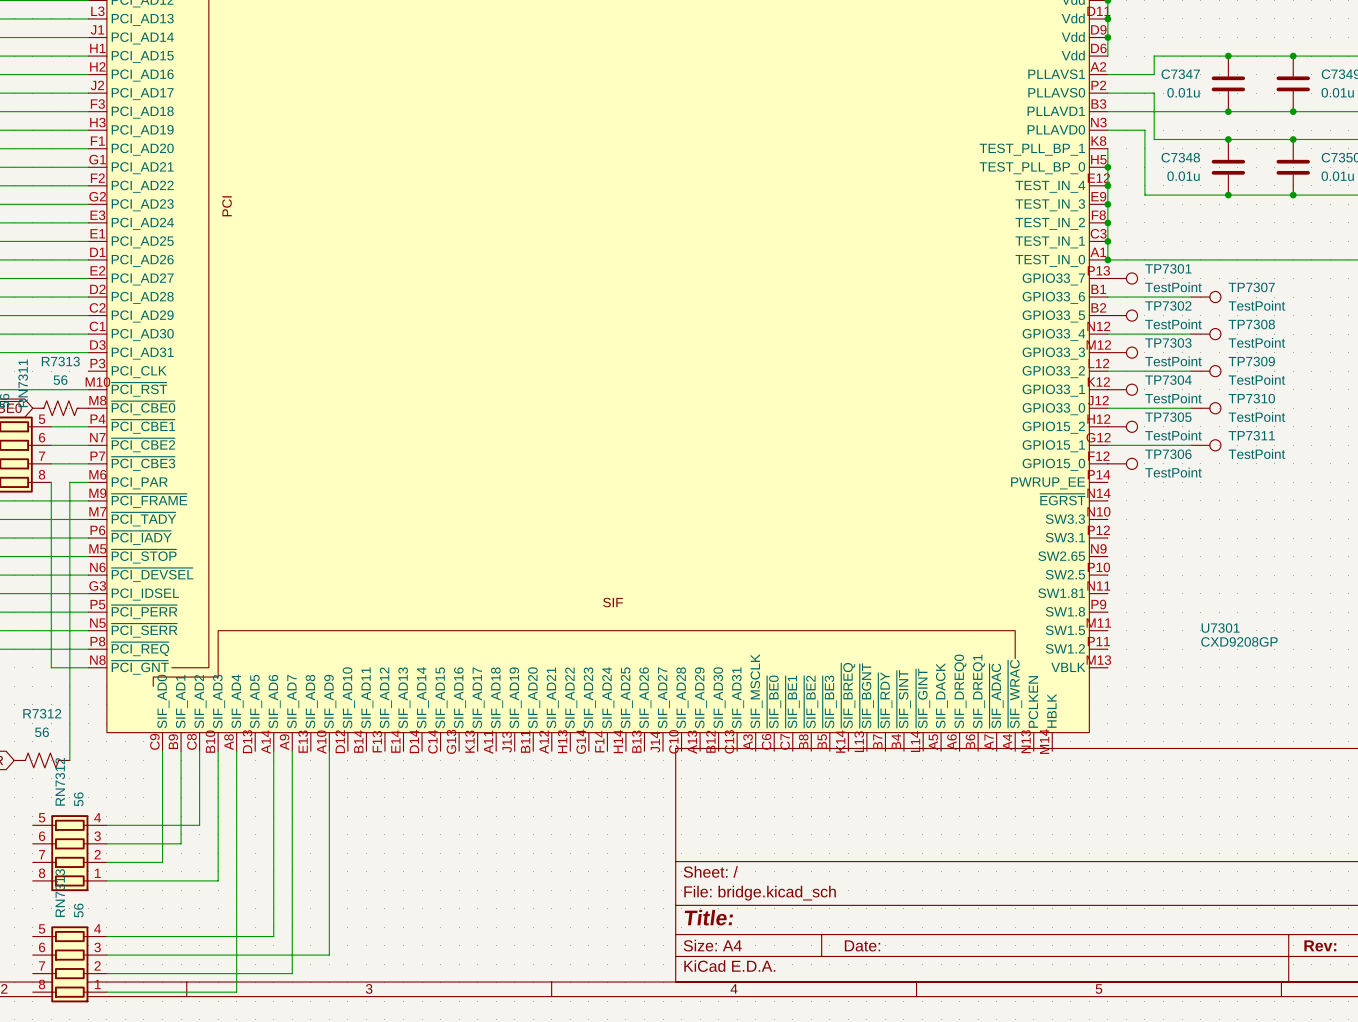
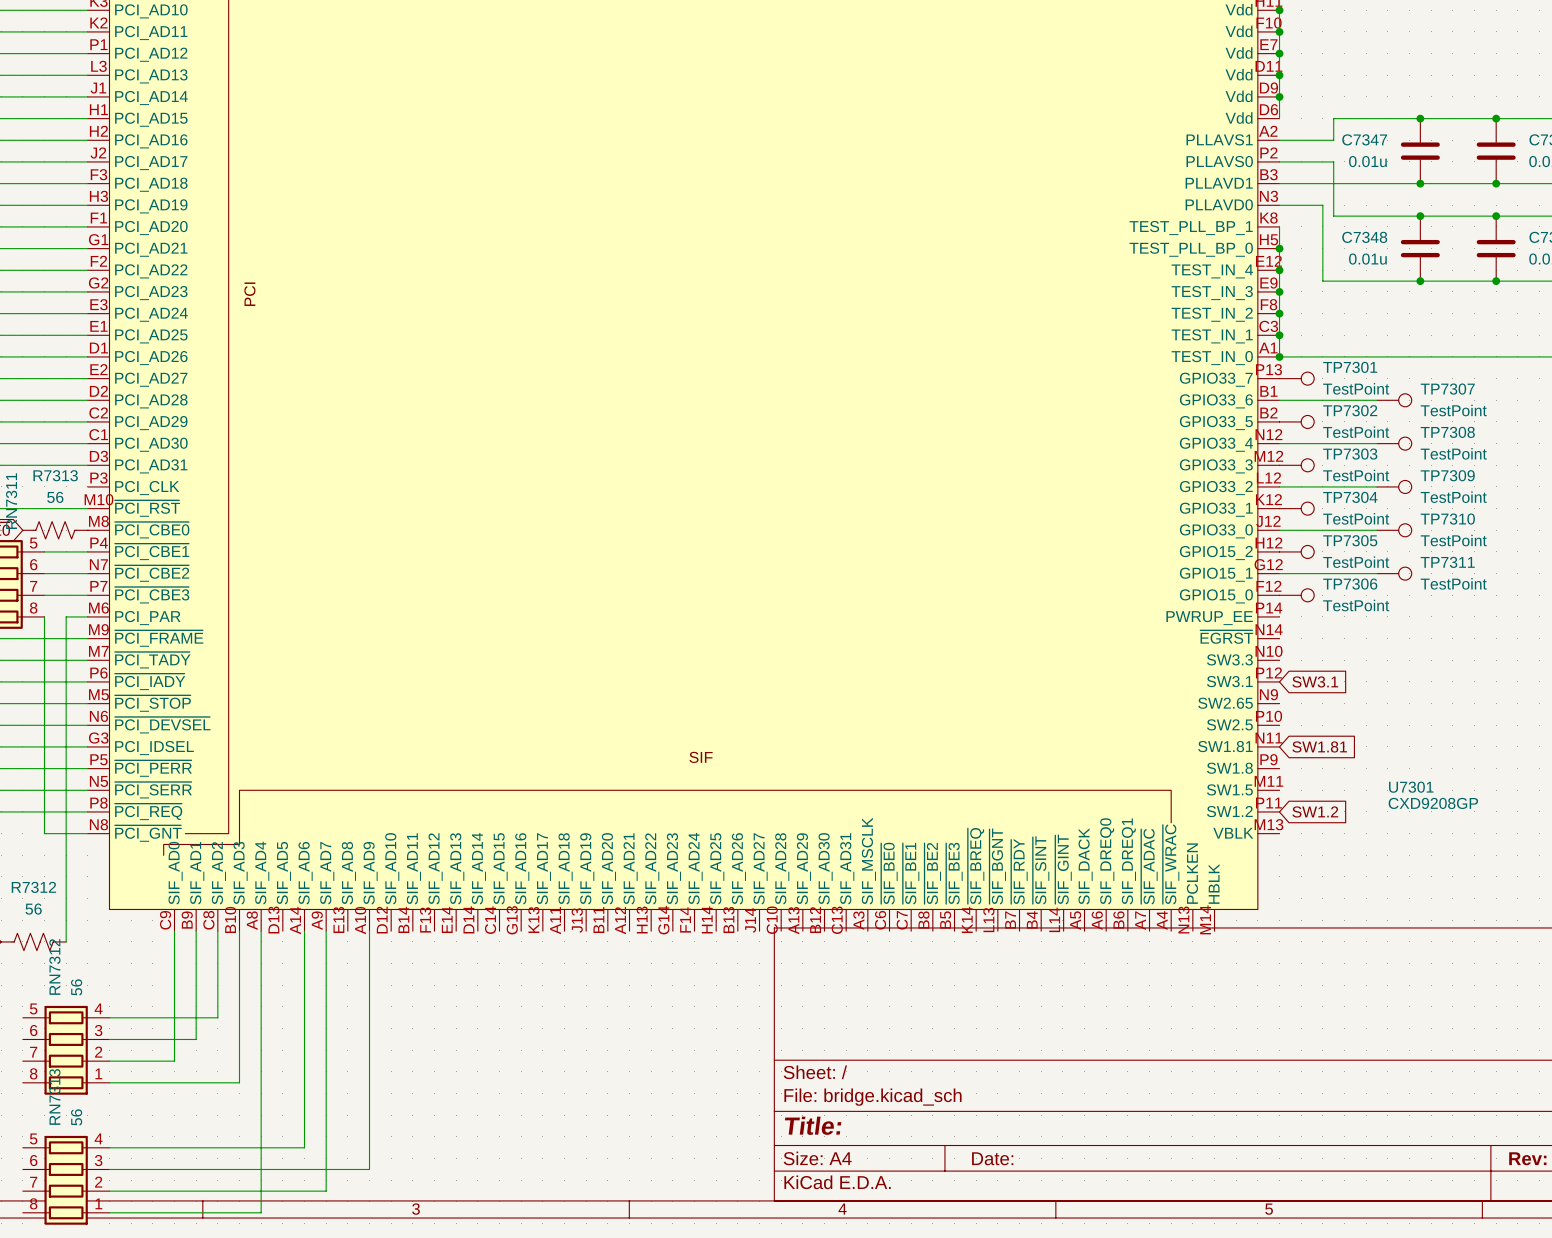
global label: none -> SW3.1 (1315, 681)
global label: none -> SW1.81 (1319, 746)
global label: none -> SW1.2 (1315, 811)

